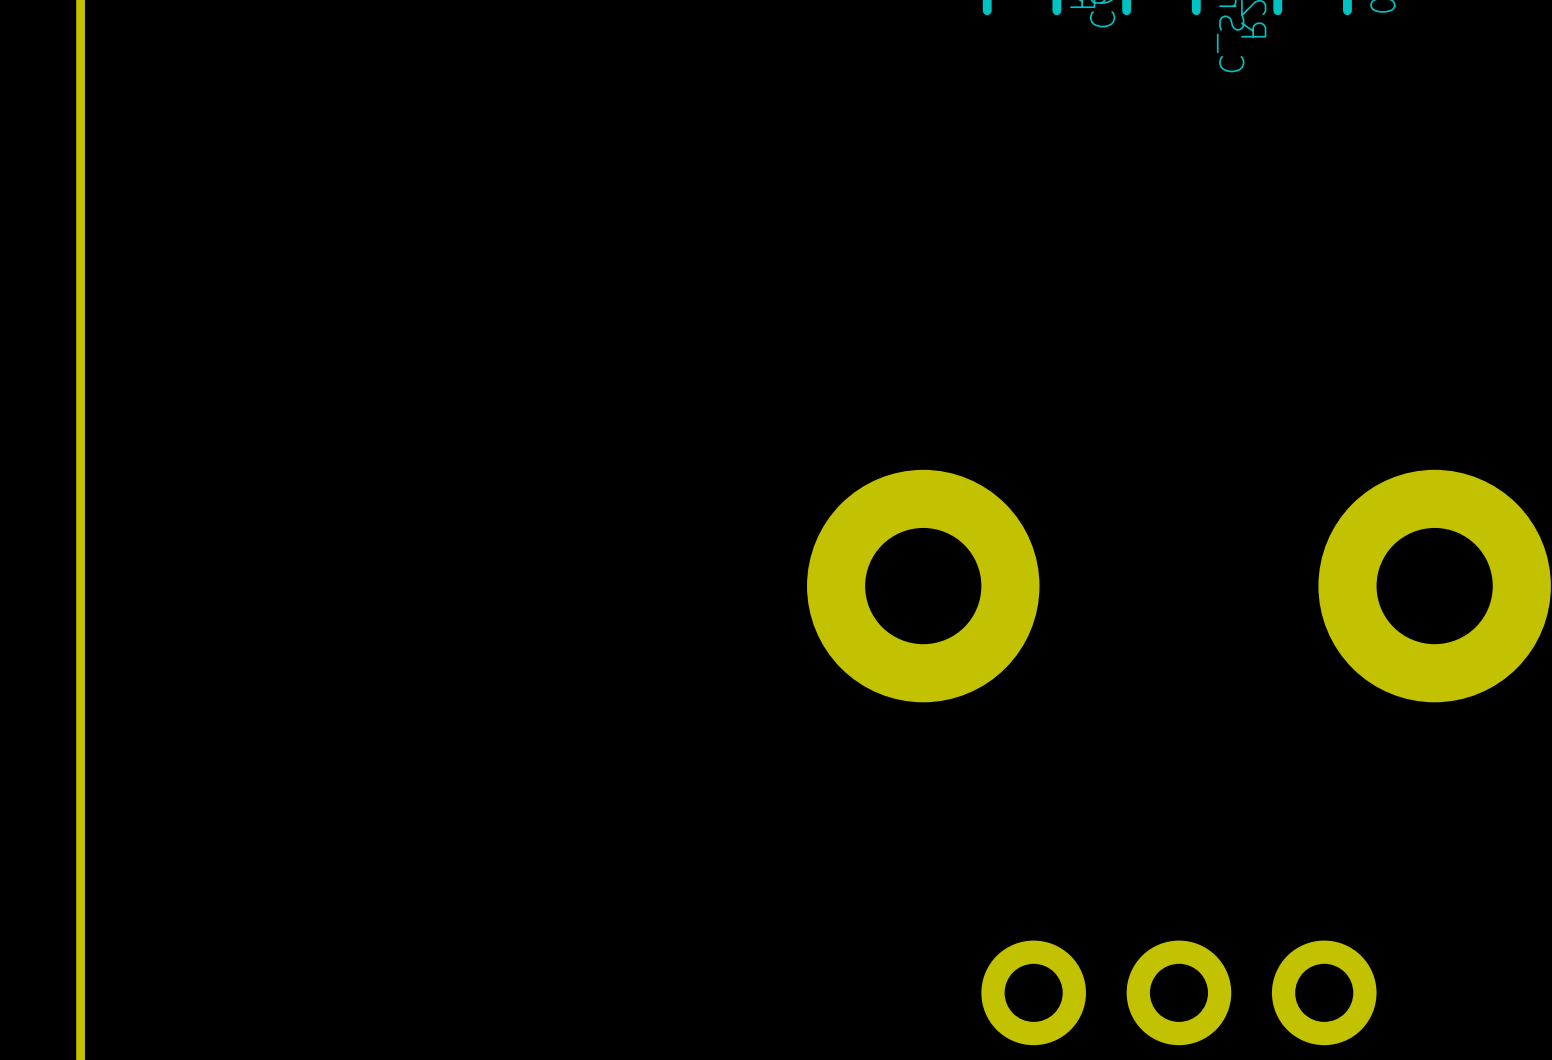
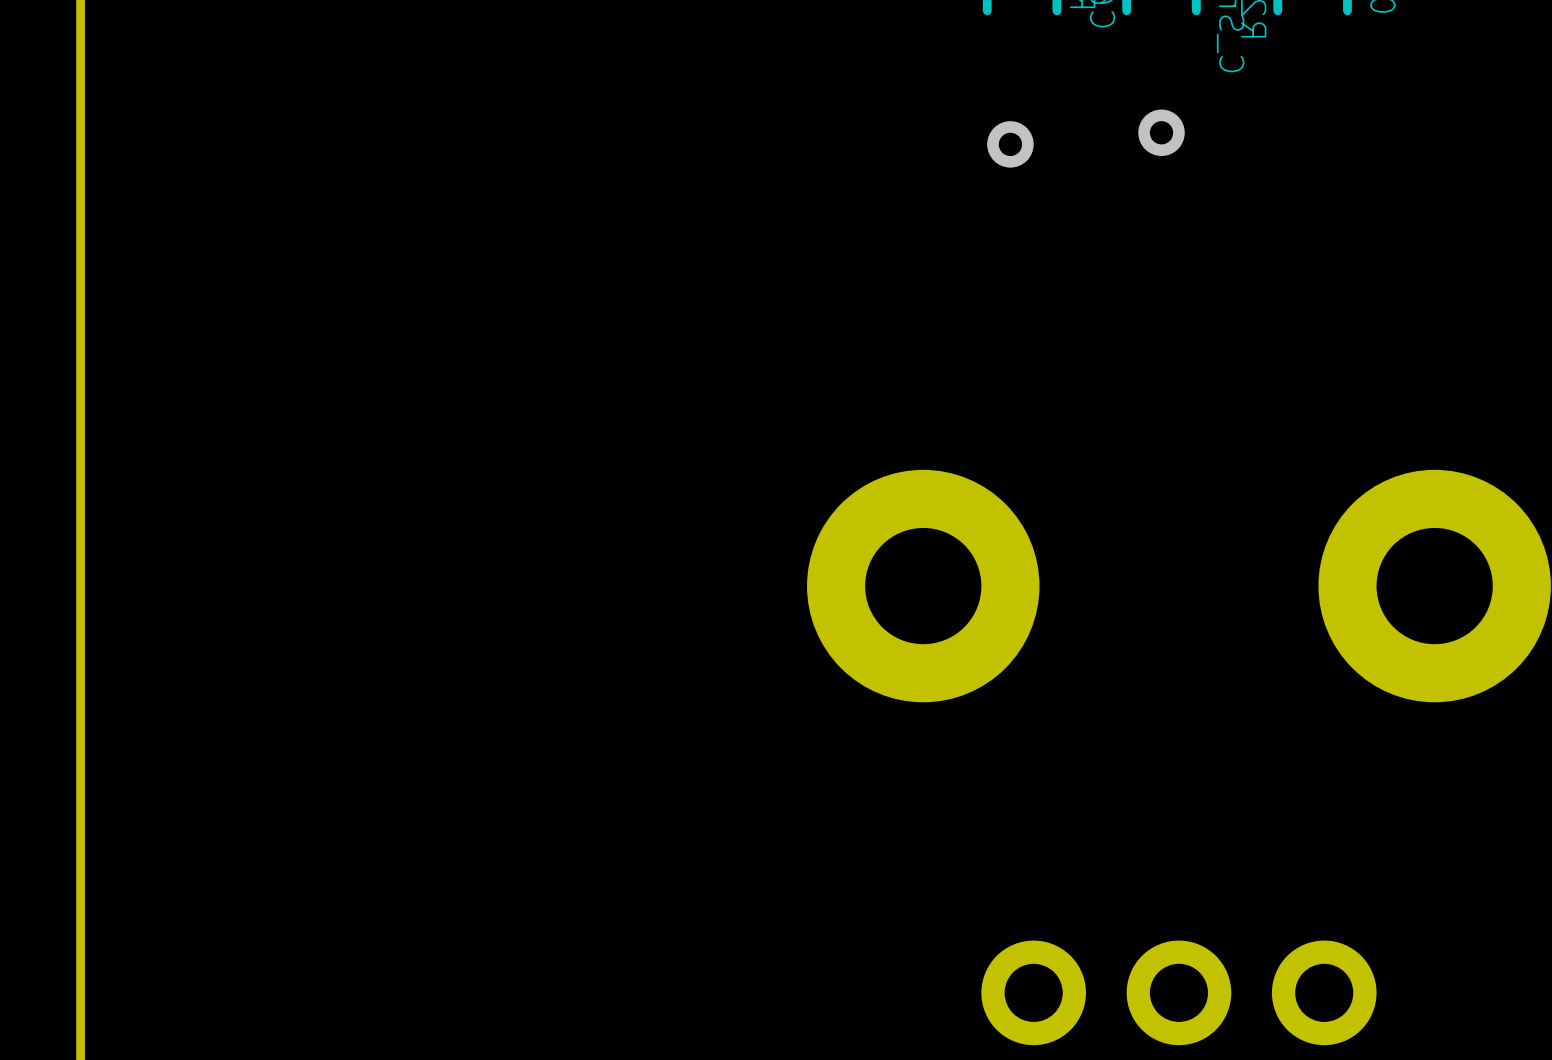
via: none -> (1161, 132)
via: none -> (1010, 144)

